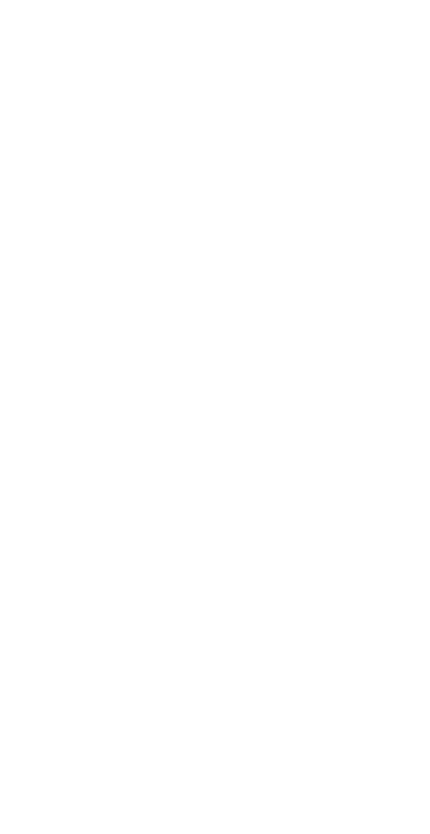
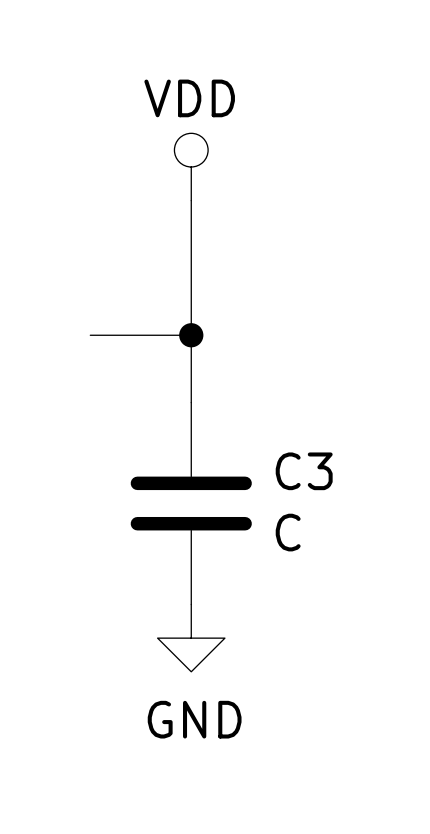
power symbol: none -> VDD (191, 166)
wire: none -> (191, 200) (191, 402)
wire: none -> (90, 335) (191, 335)
junction: none -> (191, 335)
C3: none -> C (191, 503)
power symbol: none -> GND (191, 638)

